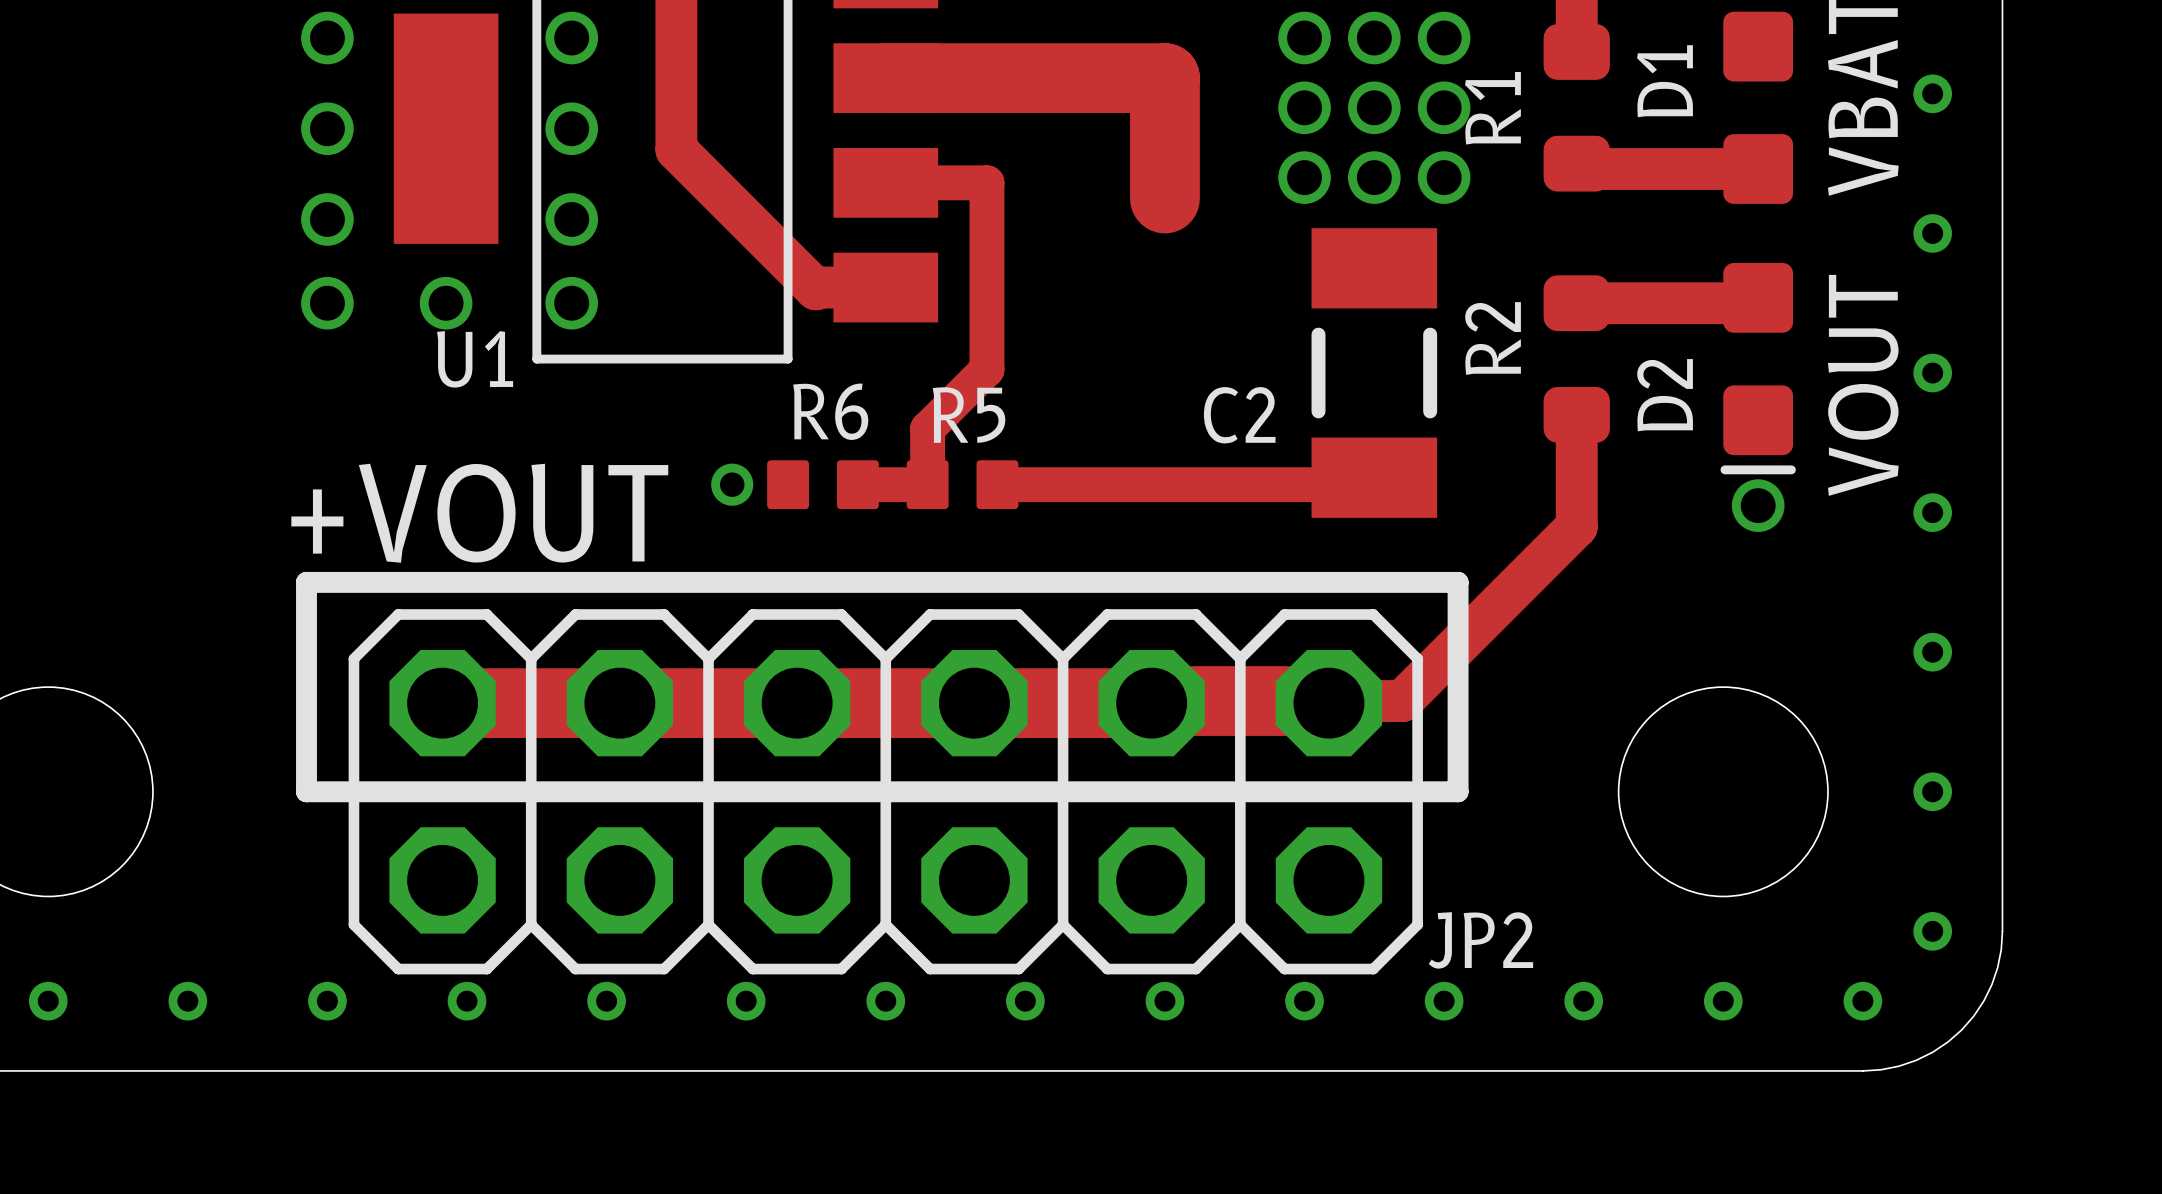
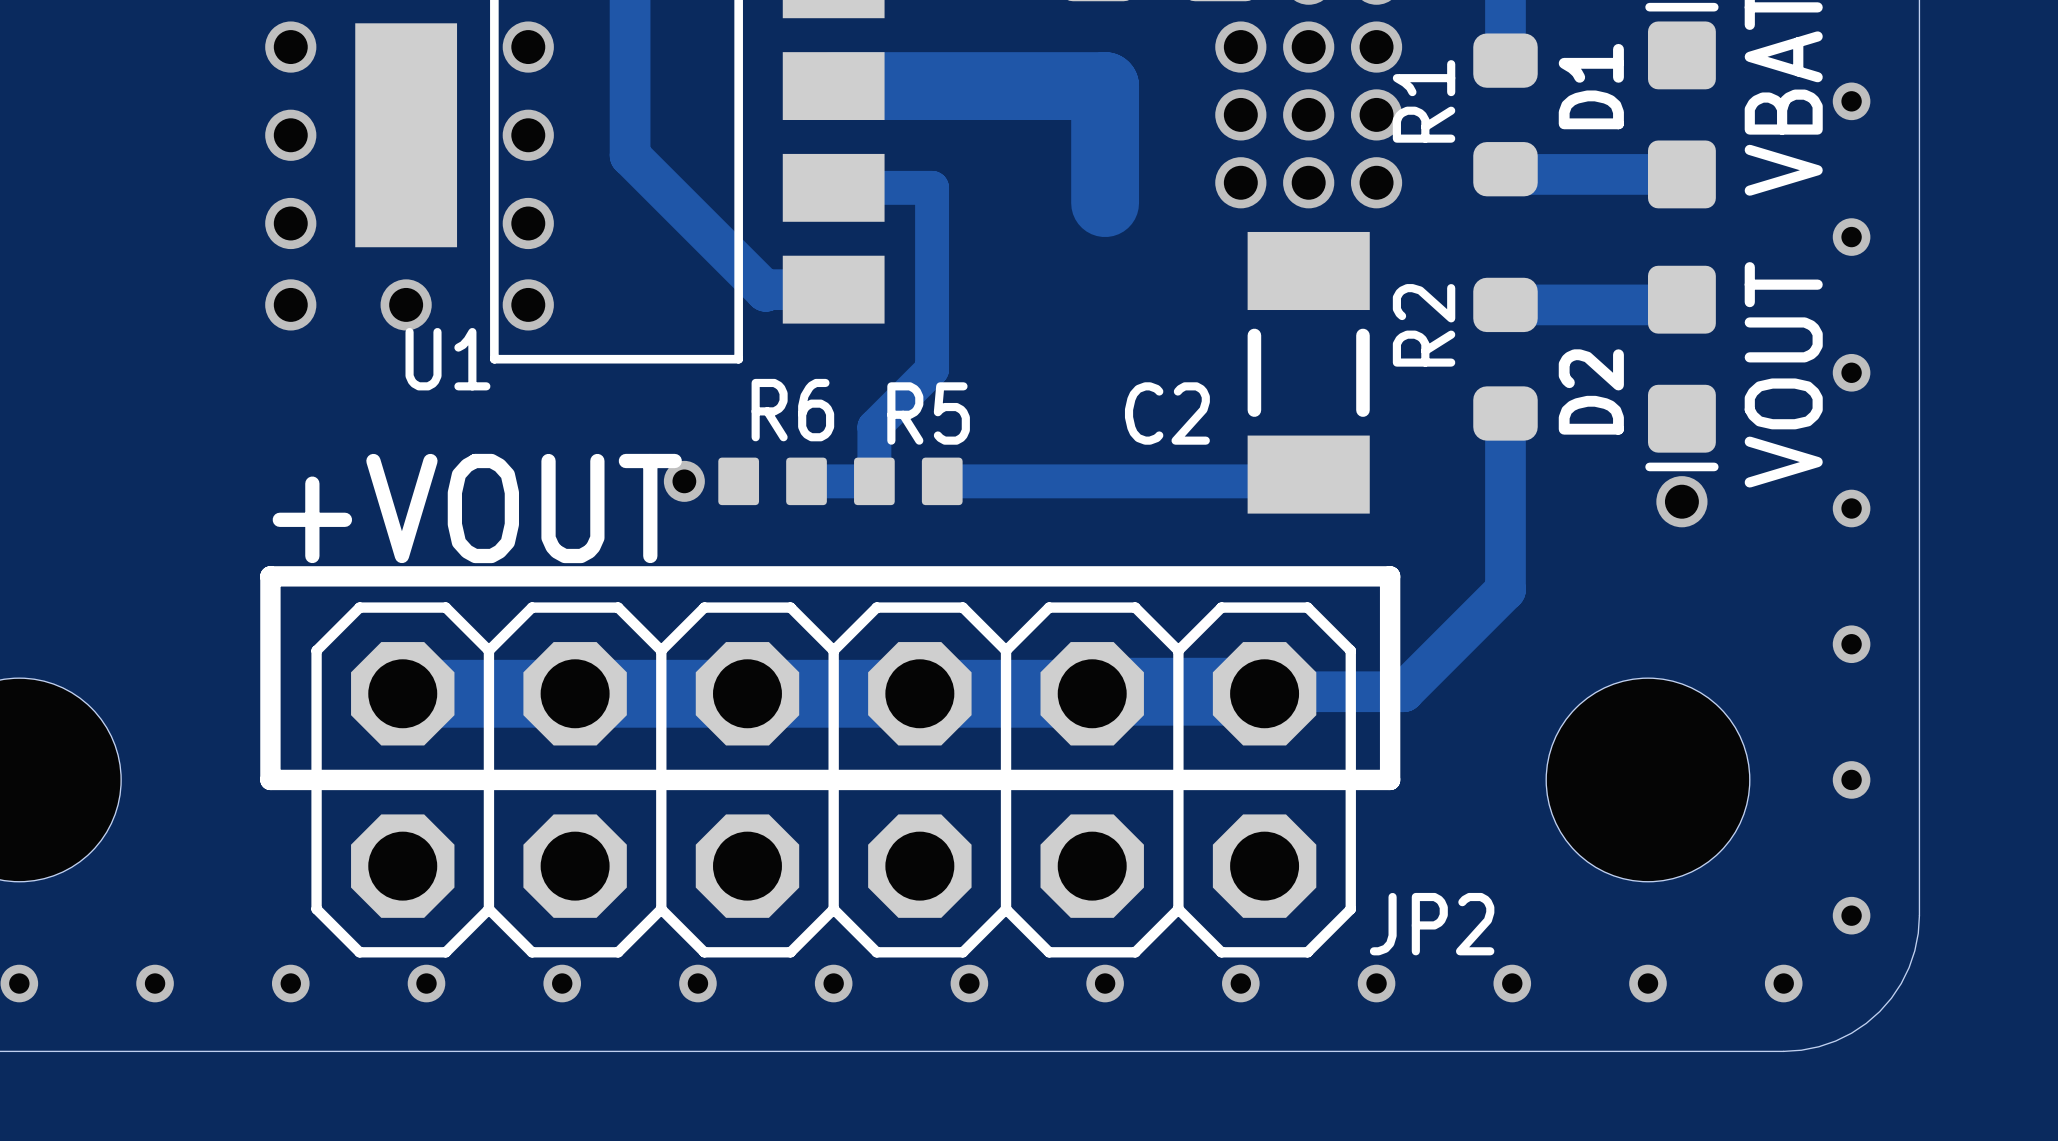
track: (1576, 526) (1402, 701) -> (1505, 522) (1505, 589) (1403, 691) (1335, 691)

